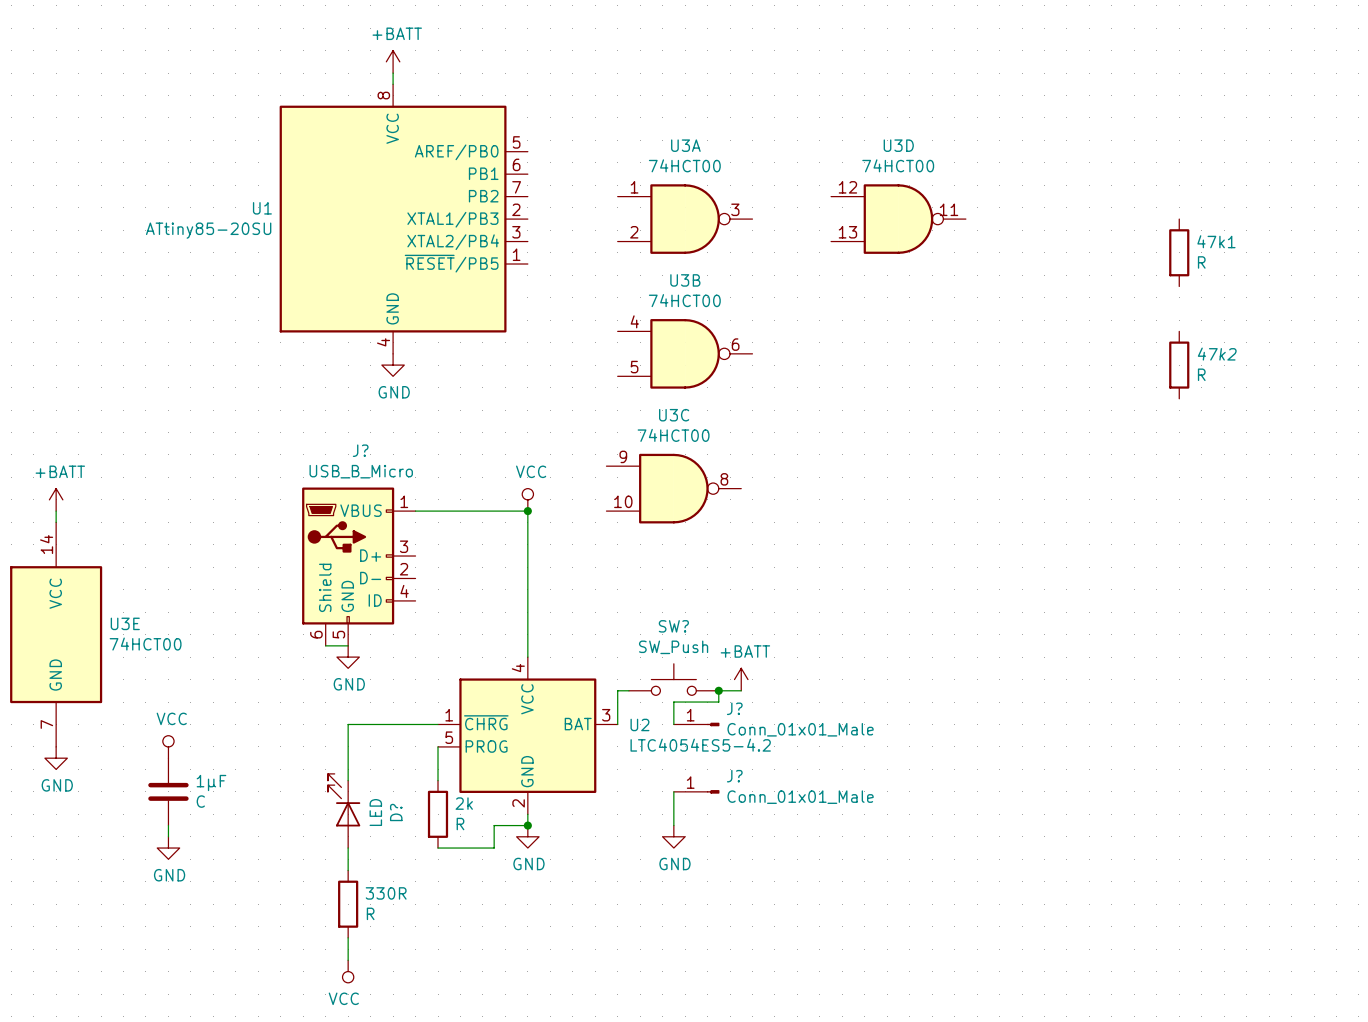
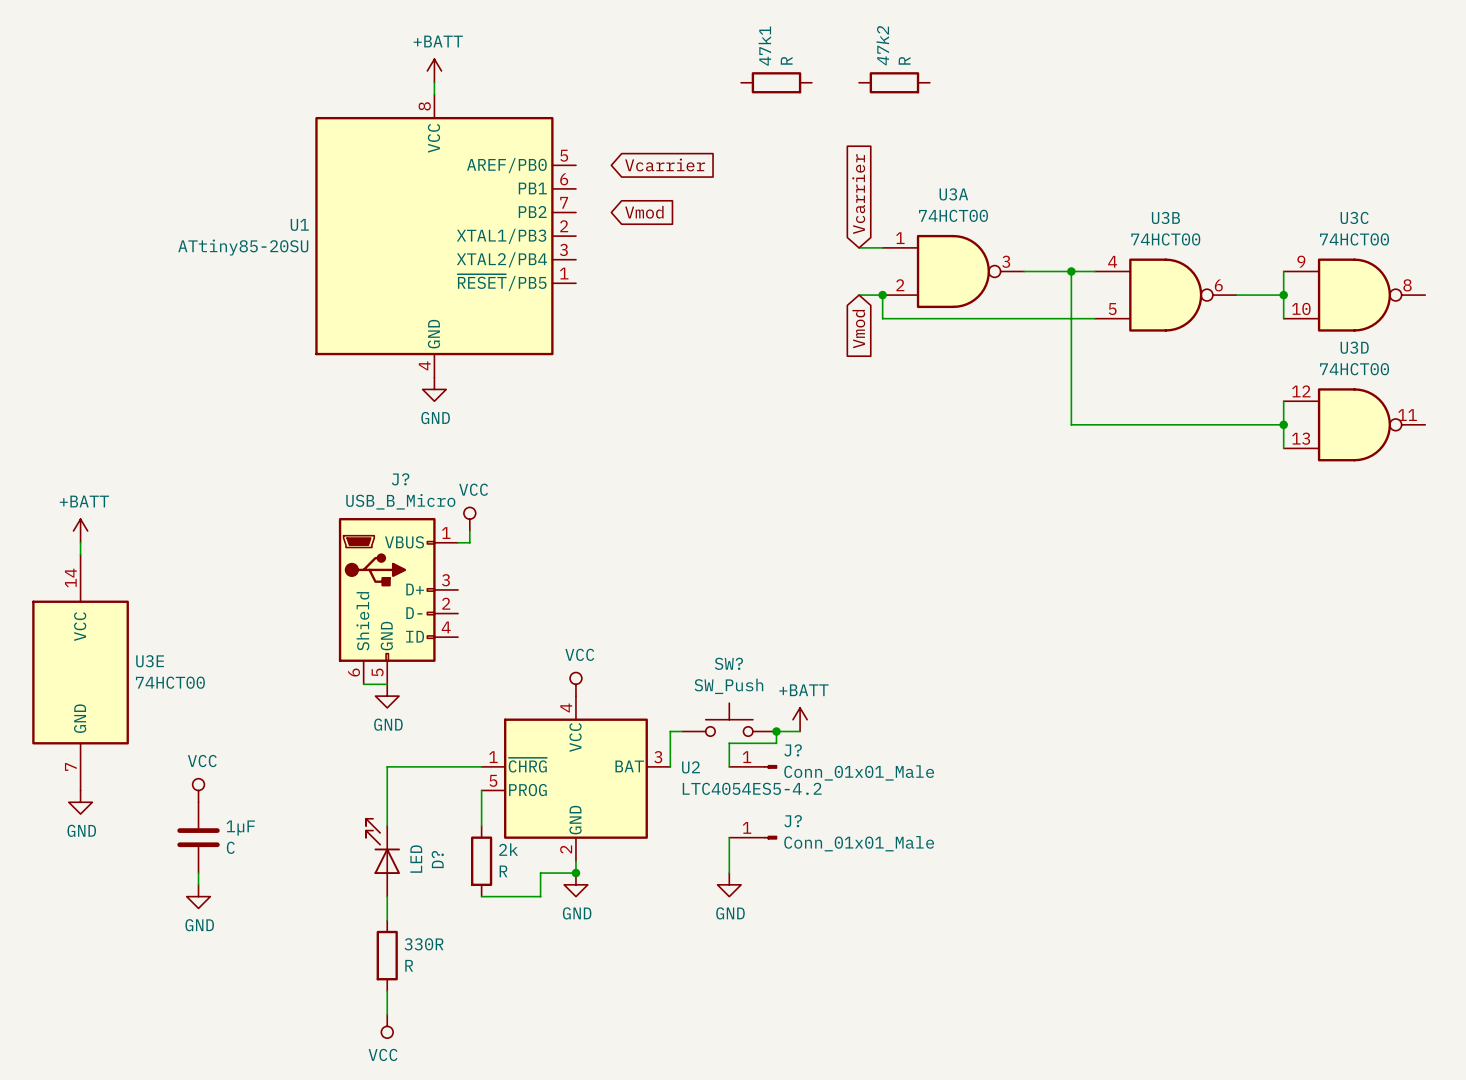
global label: none -> Vcarrier (665, 165)
global label: none -> Vcarrier (858, 194)
global label: none -> Vmod (644, 212)
U3A position: (685, 219) -> (953, 271)
U3D position: (898, 219) -> (1354, 424)
wire: none -> (859, 247) (882, 247)
47k1 name position: 47k1 (1216, 241) -> 47k1 (764, 46)
wire: none -> (1024, 271) (1094, 271)
wire: none -> (1071, 271) (1071, 424) (1283, 424)
junction: none -> (1071, 271)
47k1 rotation: 0° (1179, 252) -> 90° clockwise (776, 82)
47k1 position: (1179, 252) -> (776, 82)
wire: none -> (1283, 271) (1283, 318)
47k1 value position: R (1201, 262) -> R (786, 60)
wire: none -> (859, 295) (882, 295) (882, 318) (1094, 318)
junction: none -> (882, 295)
wire: none -> (1236, 295) (1283, 295)
junction: none -> (1283, 295)
global label: none -> Vmod (858, 329)
U3B position: (685, 353) -> (1165, 295)
47k2 name position: 47k2 (1217, 354) -> 47k2 (882, 45)
47k2 rotation: 0° (1179, 365) -> 90° clockwise (894, 82)
47k2 position: (1179, 365) -> (894, 82)
47k2 value position: R (1201, 374) -> R (904, 60)
wire: none -> (1283, 401) (1283, 448)
junction: none -> (1283, 424)
power symbol: none -> VCC (469, 519)
U3C position: (673, 488) -> (1354, 295)
power symbol: VCC (527, 499) -> none
wire: (426, 511) (527, 511) (527, 657) -> (469, 542) (469, 530)
junction: (527, 511) -> none
power symbol: none -> VCC (575, 684)

